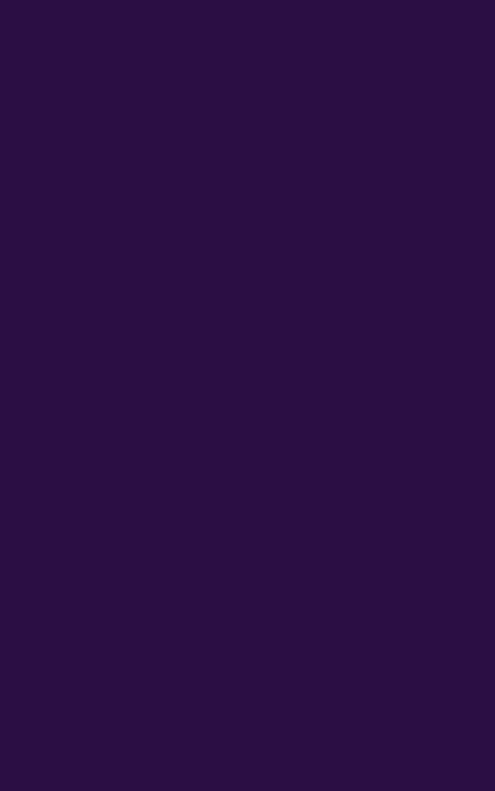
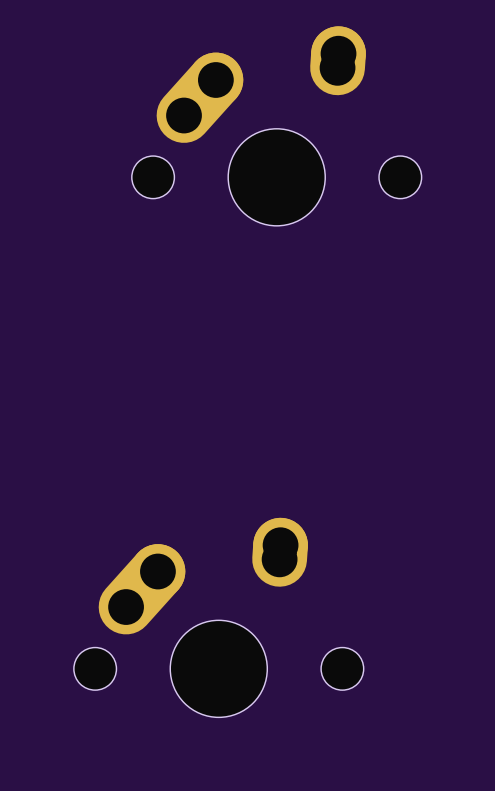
part: none -> (276, 126)
part: none -> (218, 617)

